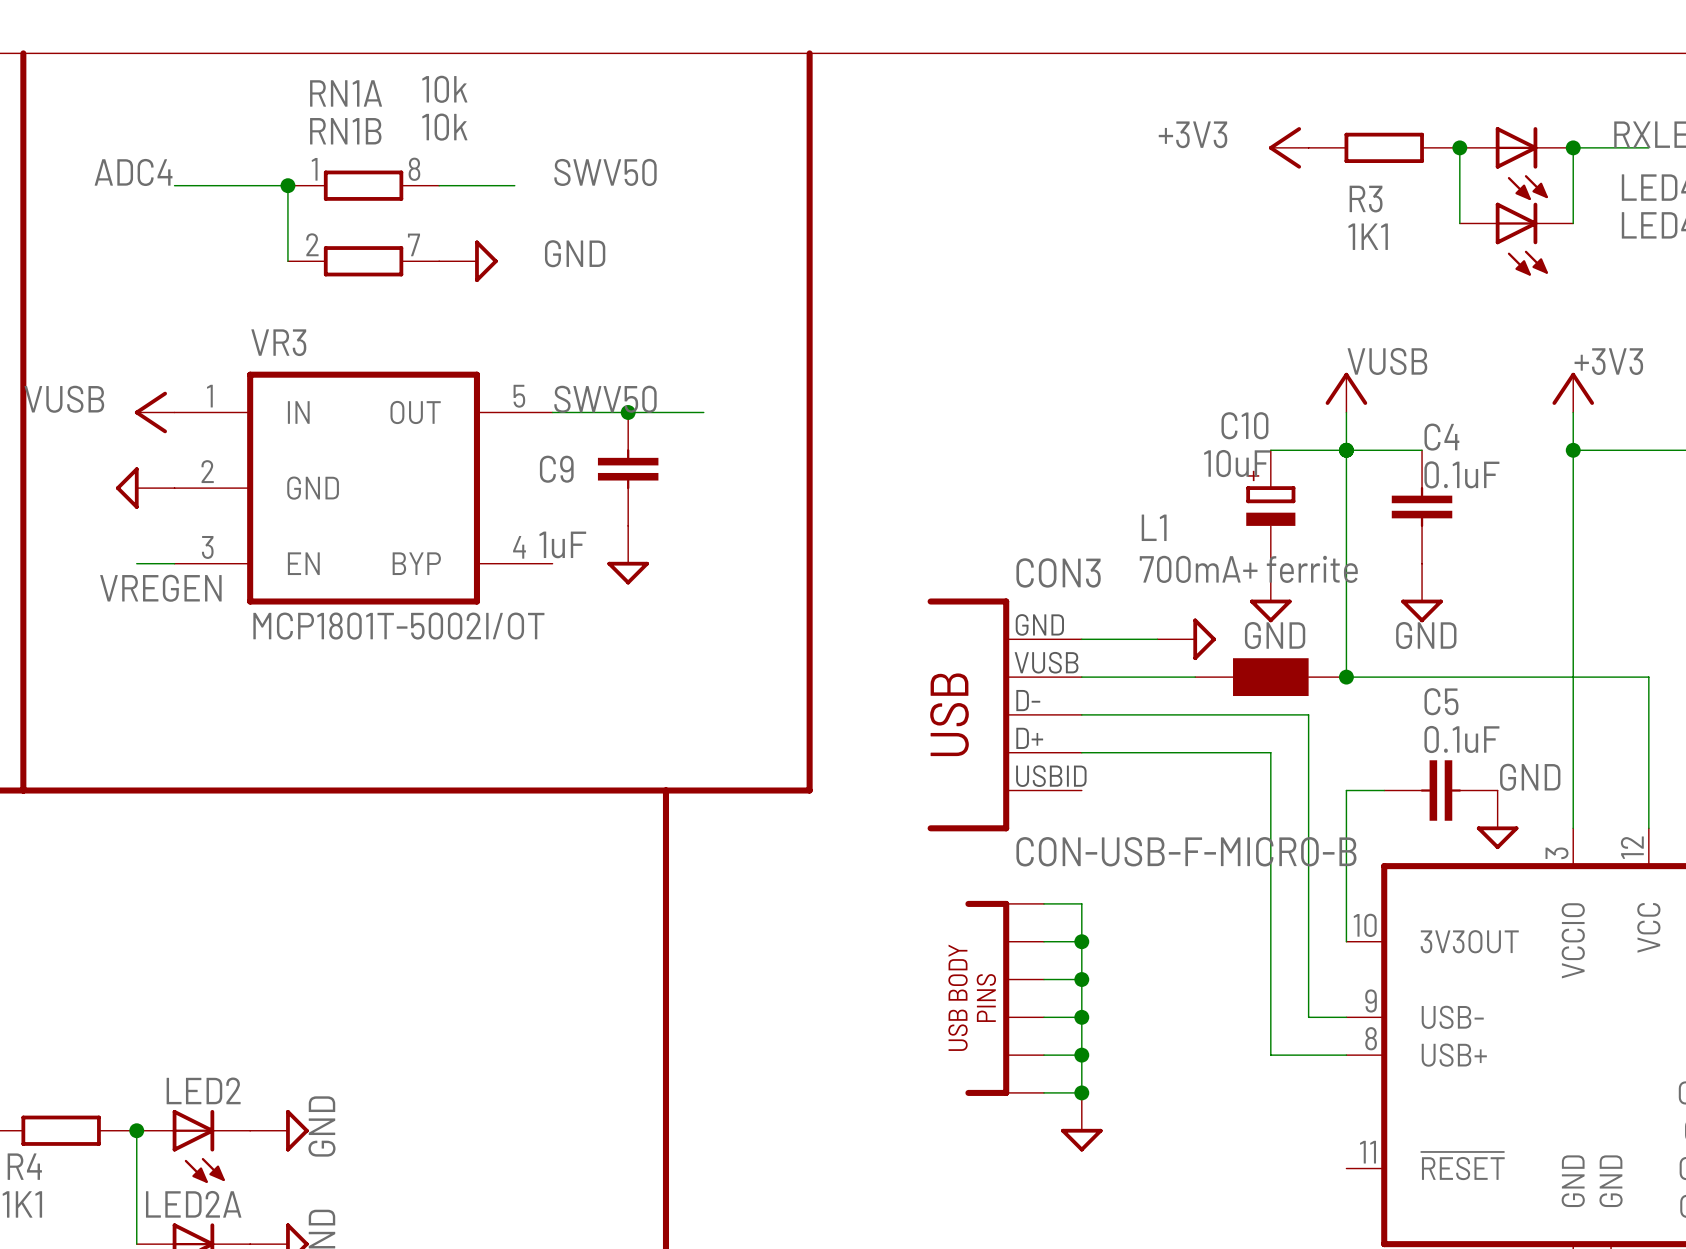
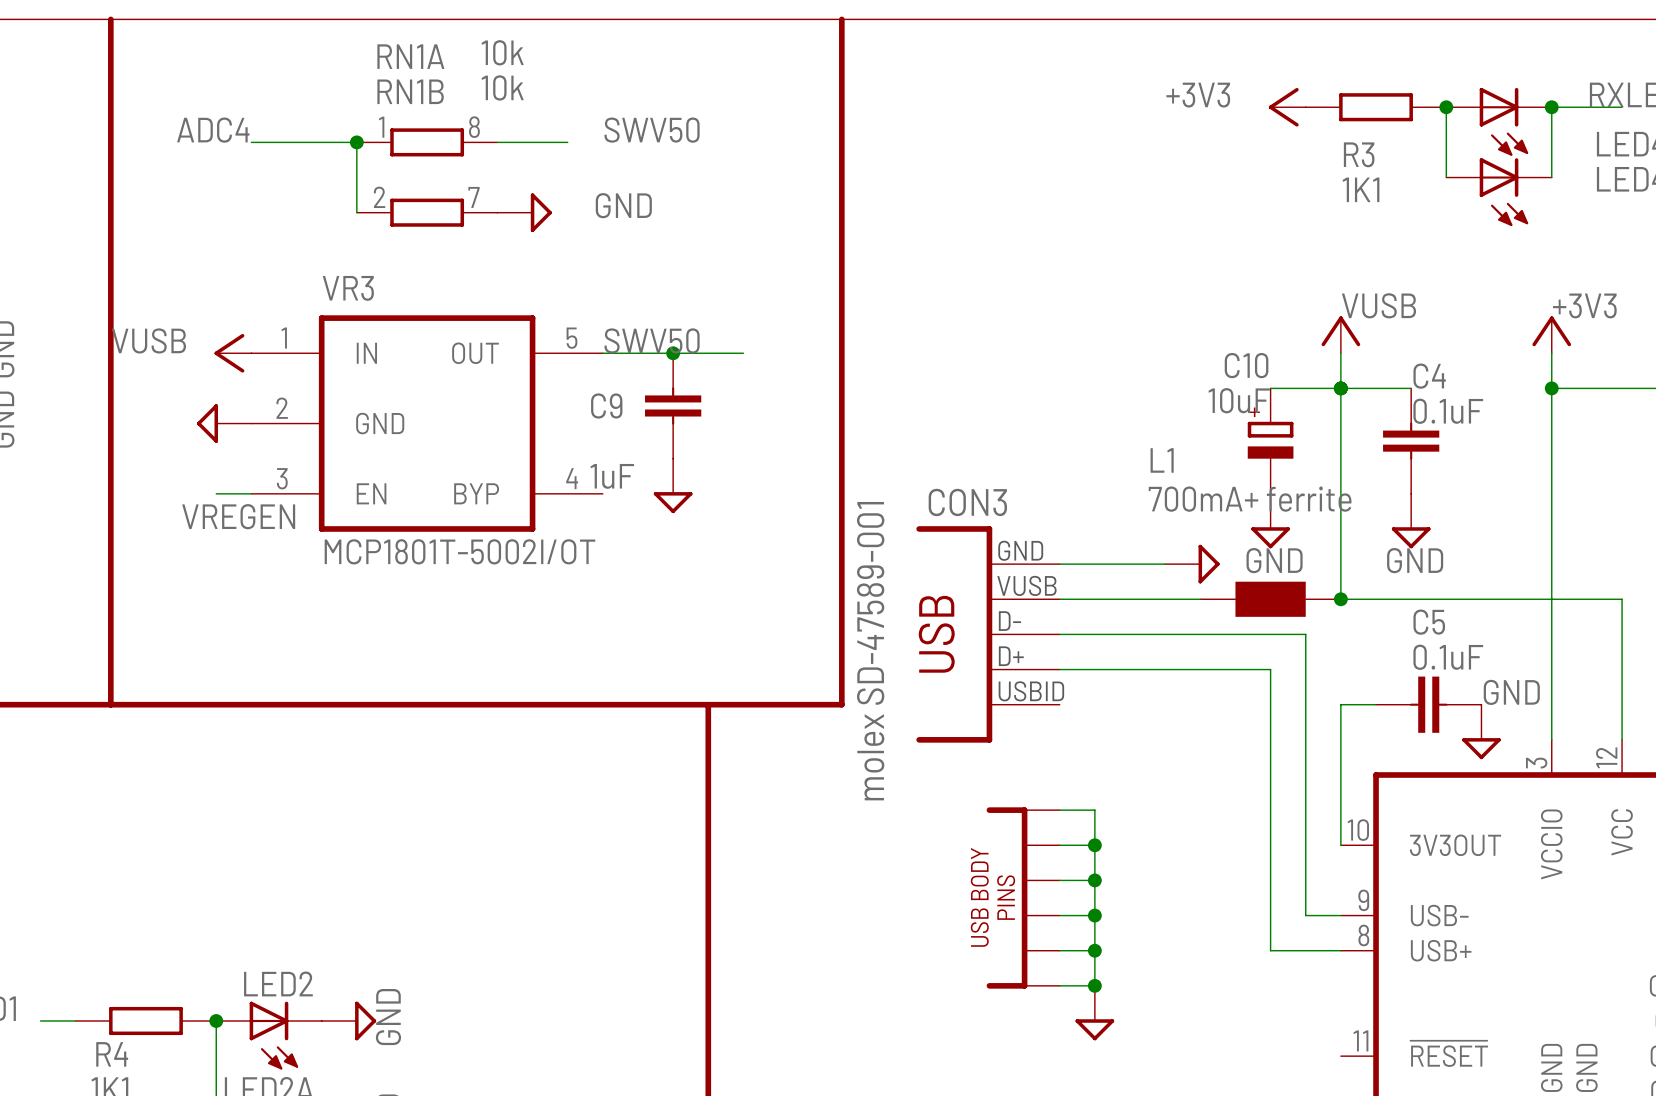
CON3 name position: CON3 (1058, 572) -> CON3 (967, 502)
CON3 position: (1004, 714) -> (988, 634)
CON3 value: CON-USB-F-MICRO-B (1186, 851) -> molex SD-47589-001 (870, 651)

